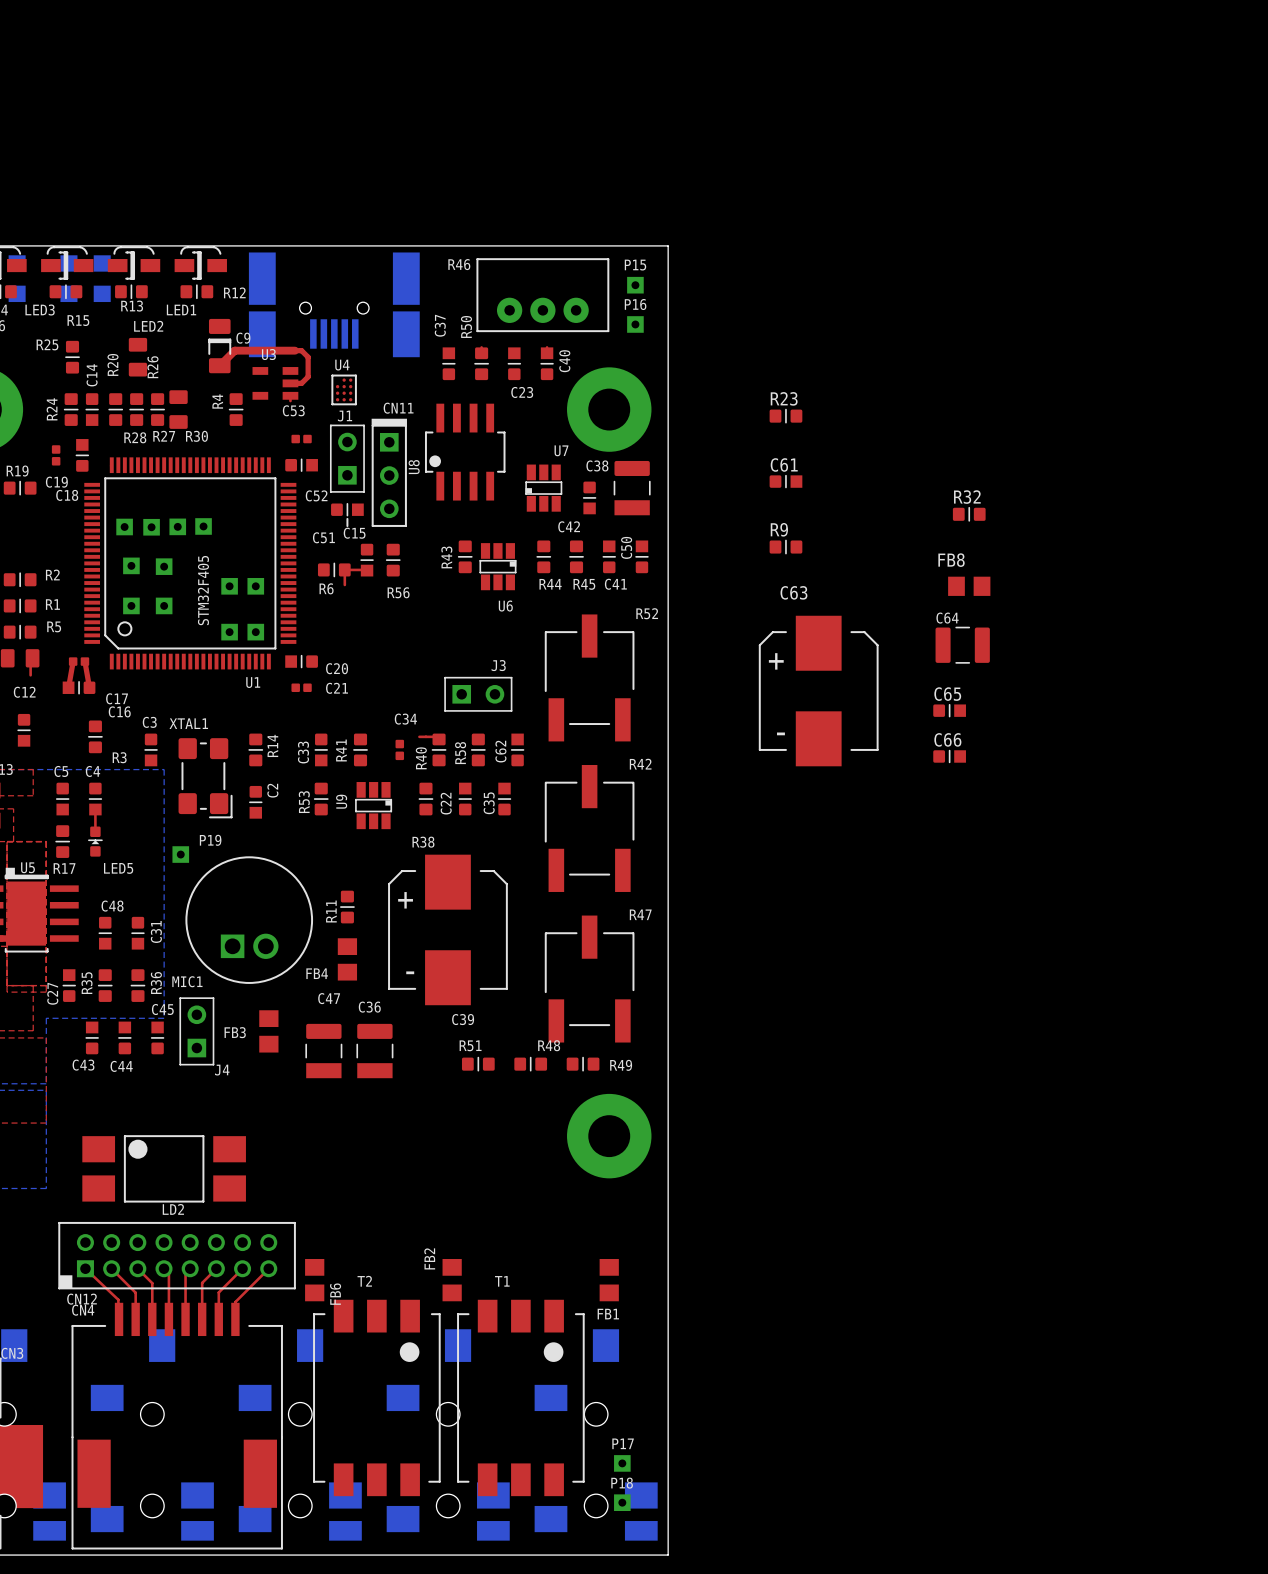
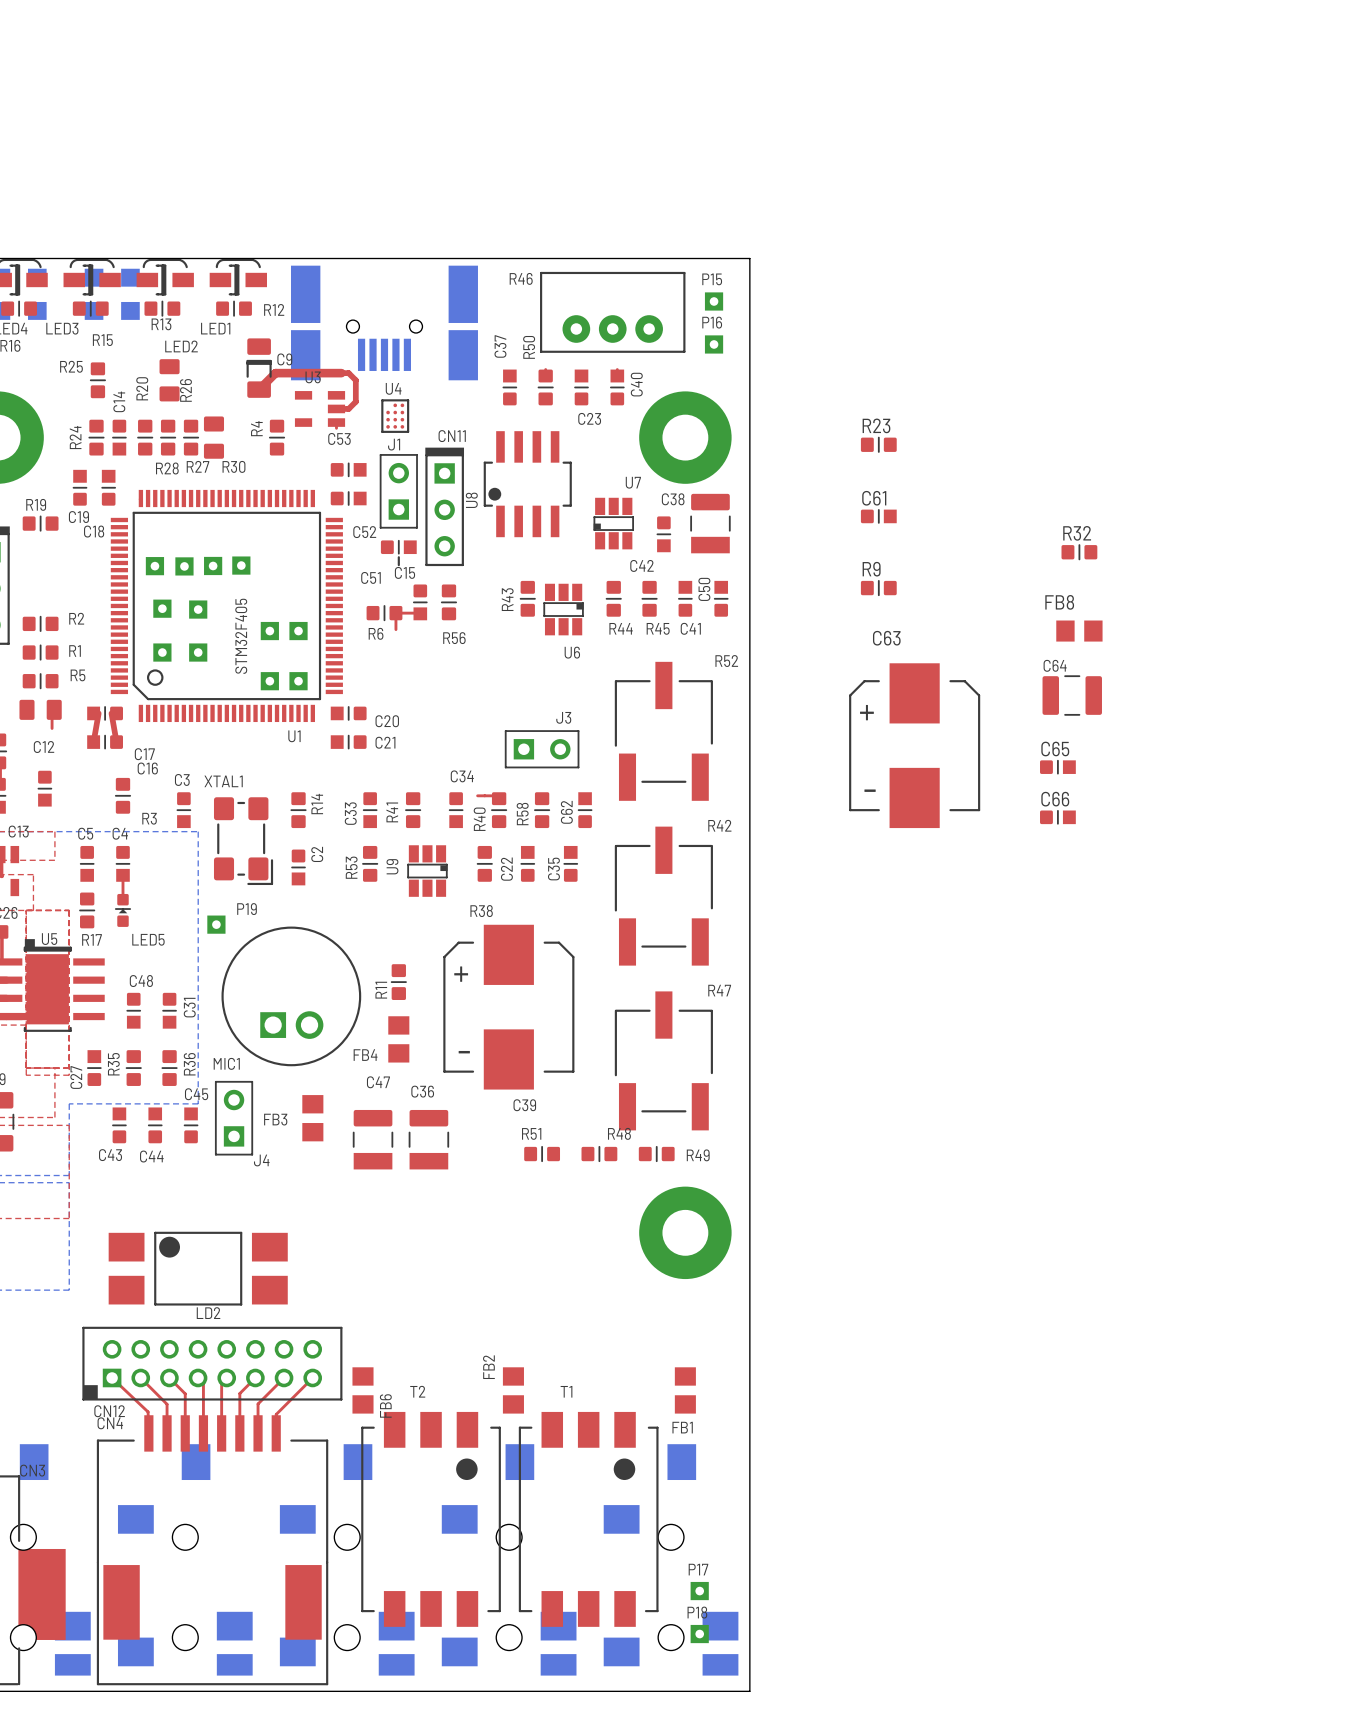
C53 footprint: [291, 434, 312, 444] -> [330, 462, 367, 478]
C19 footprint: [51, 445, 61, 466] -> [72, 469, 88, 506]
C17 footprint: [68, 657, 90, 666] -> [87, 706, 123, 721]
C21 footprint: [291, 683, 312, 693] -> [330, 734, 367, 750]
C34 footprint: [395, 739, 405, 761] -> [448, 792, 464, 829]

